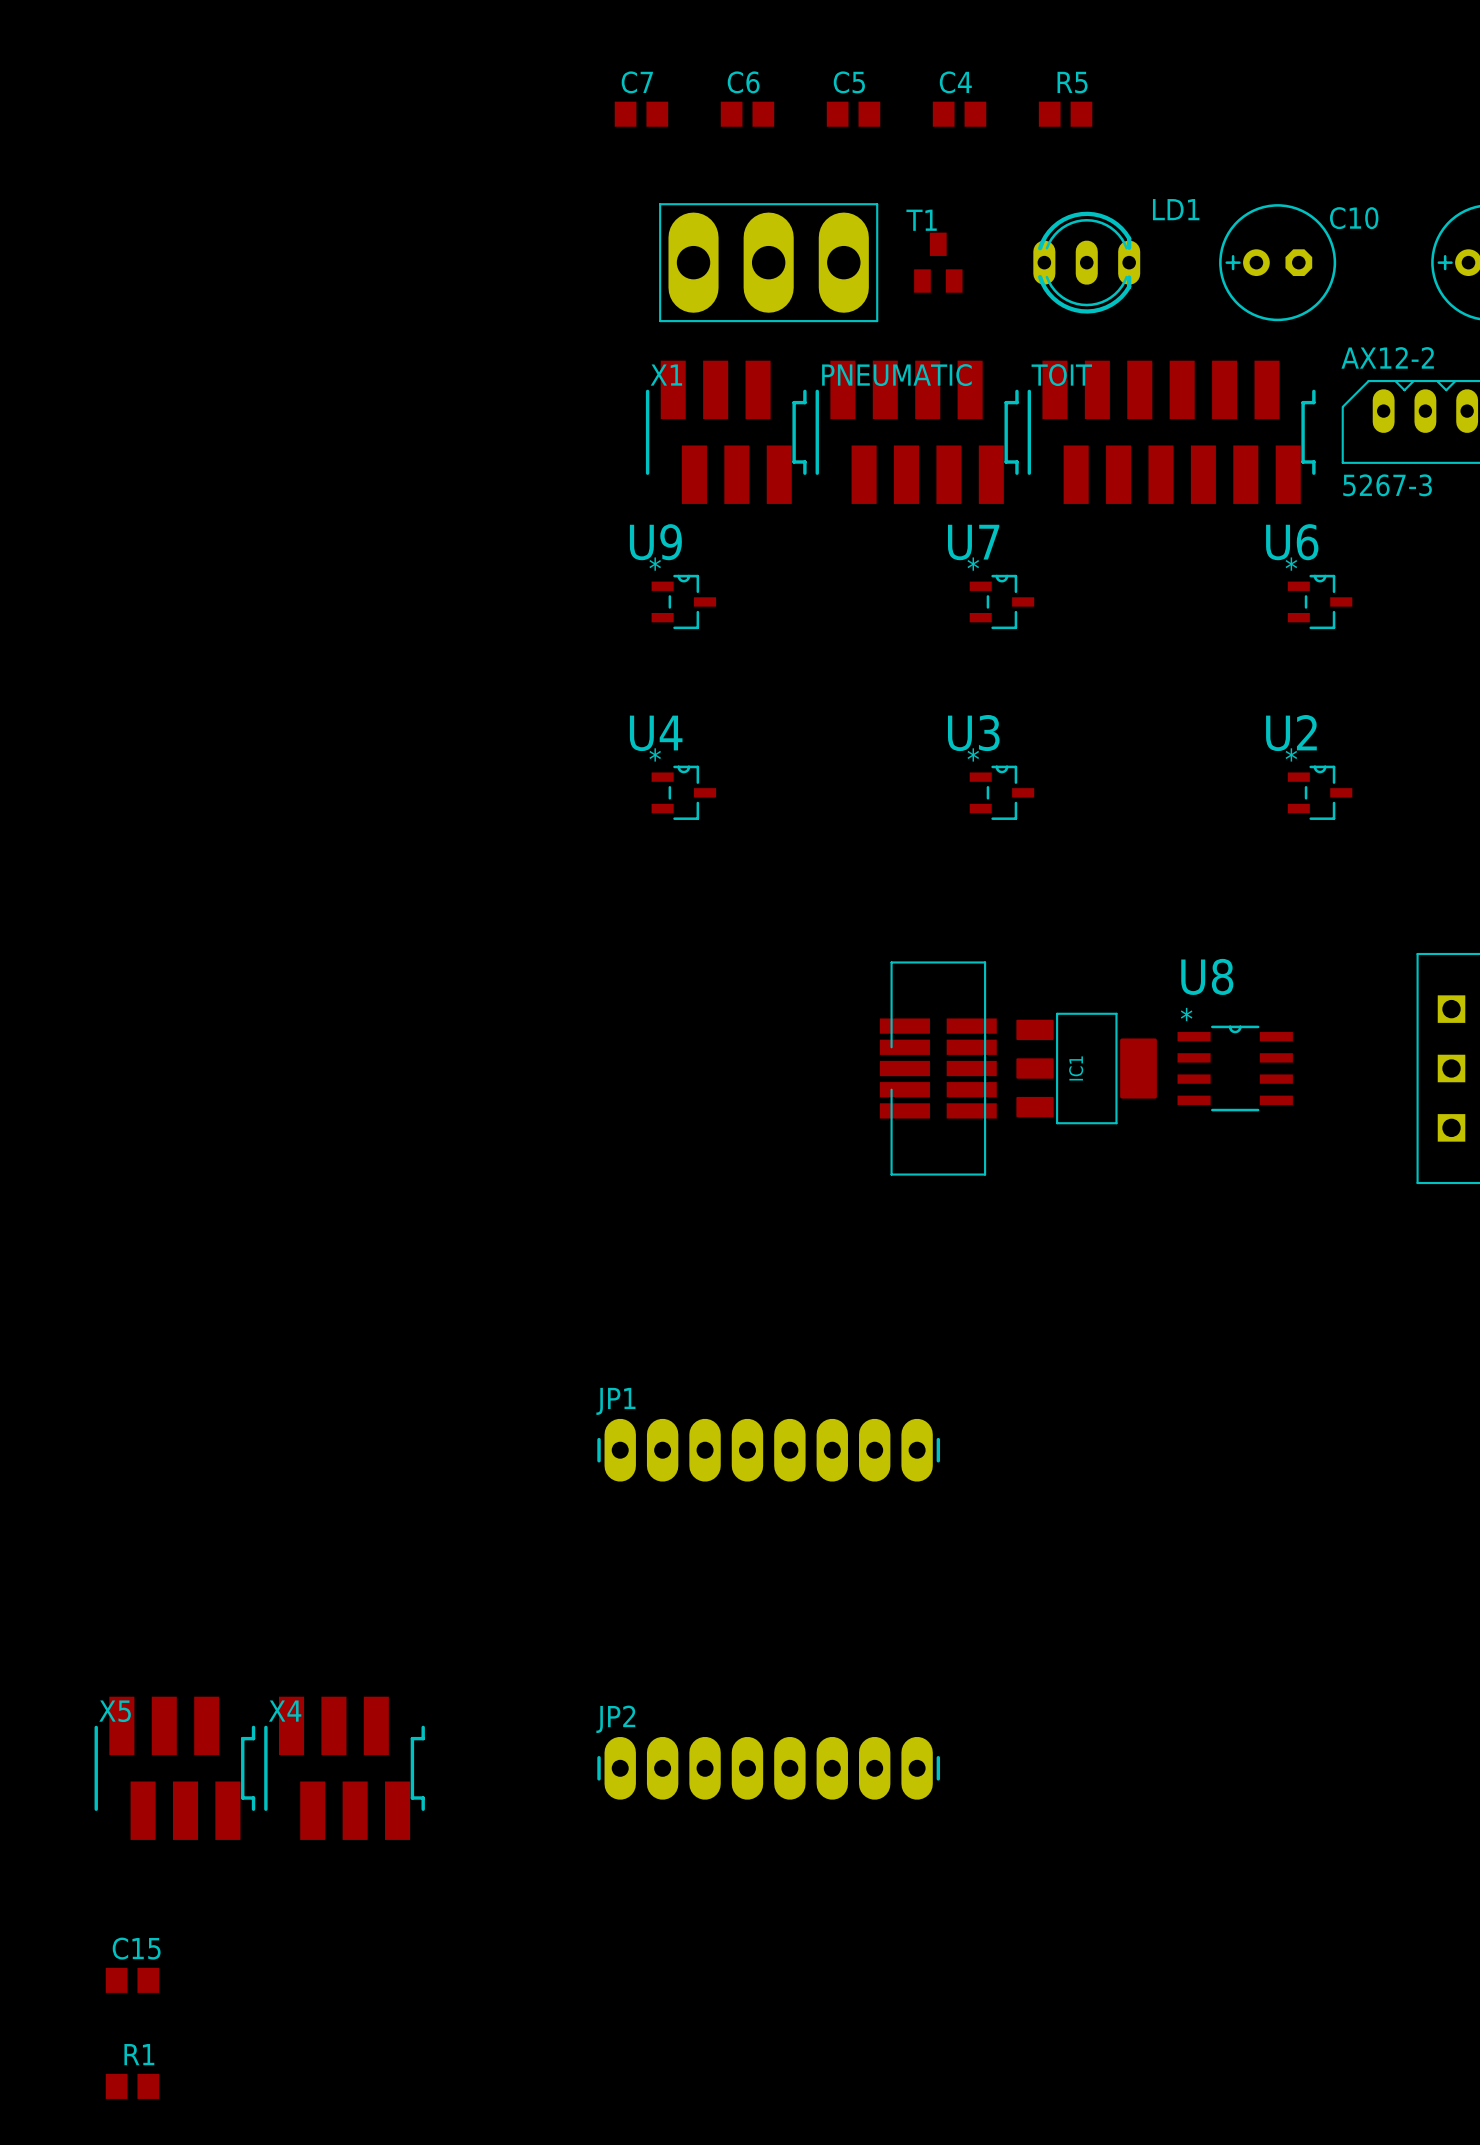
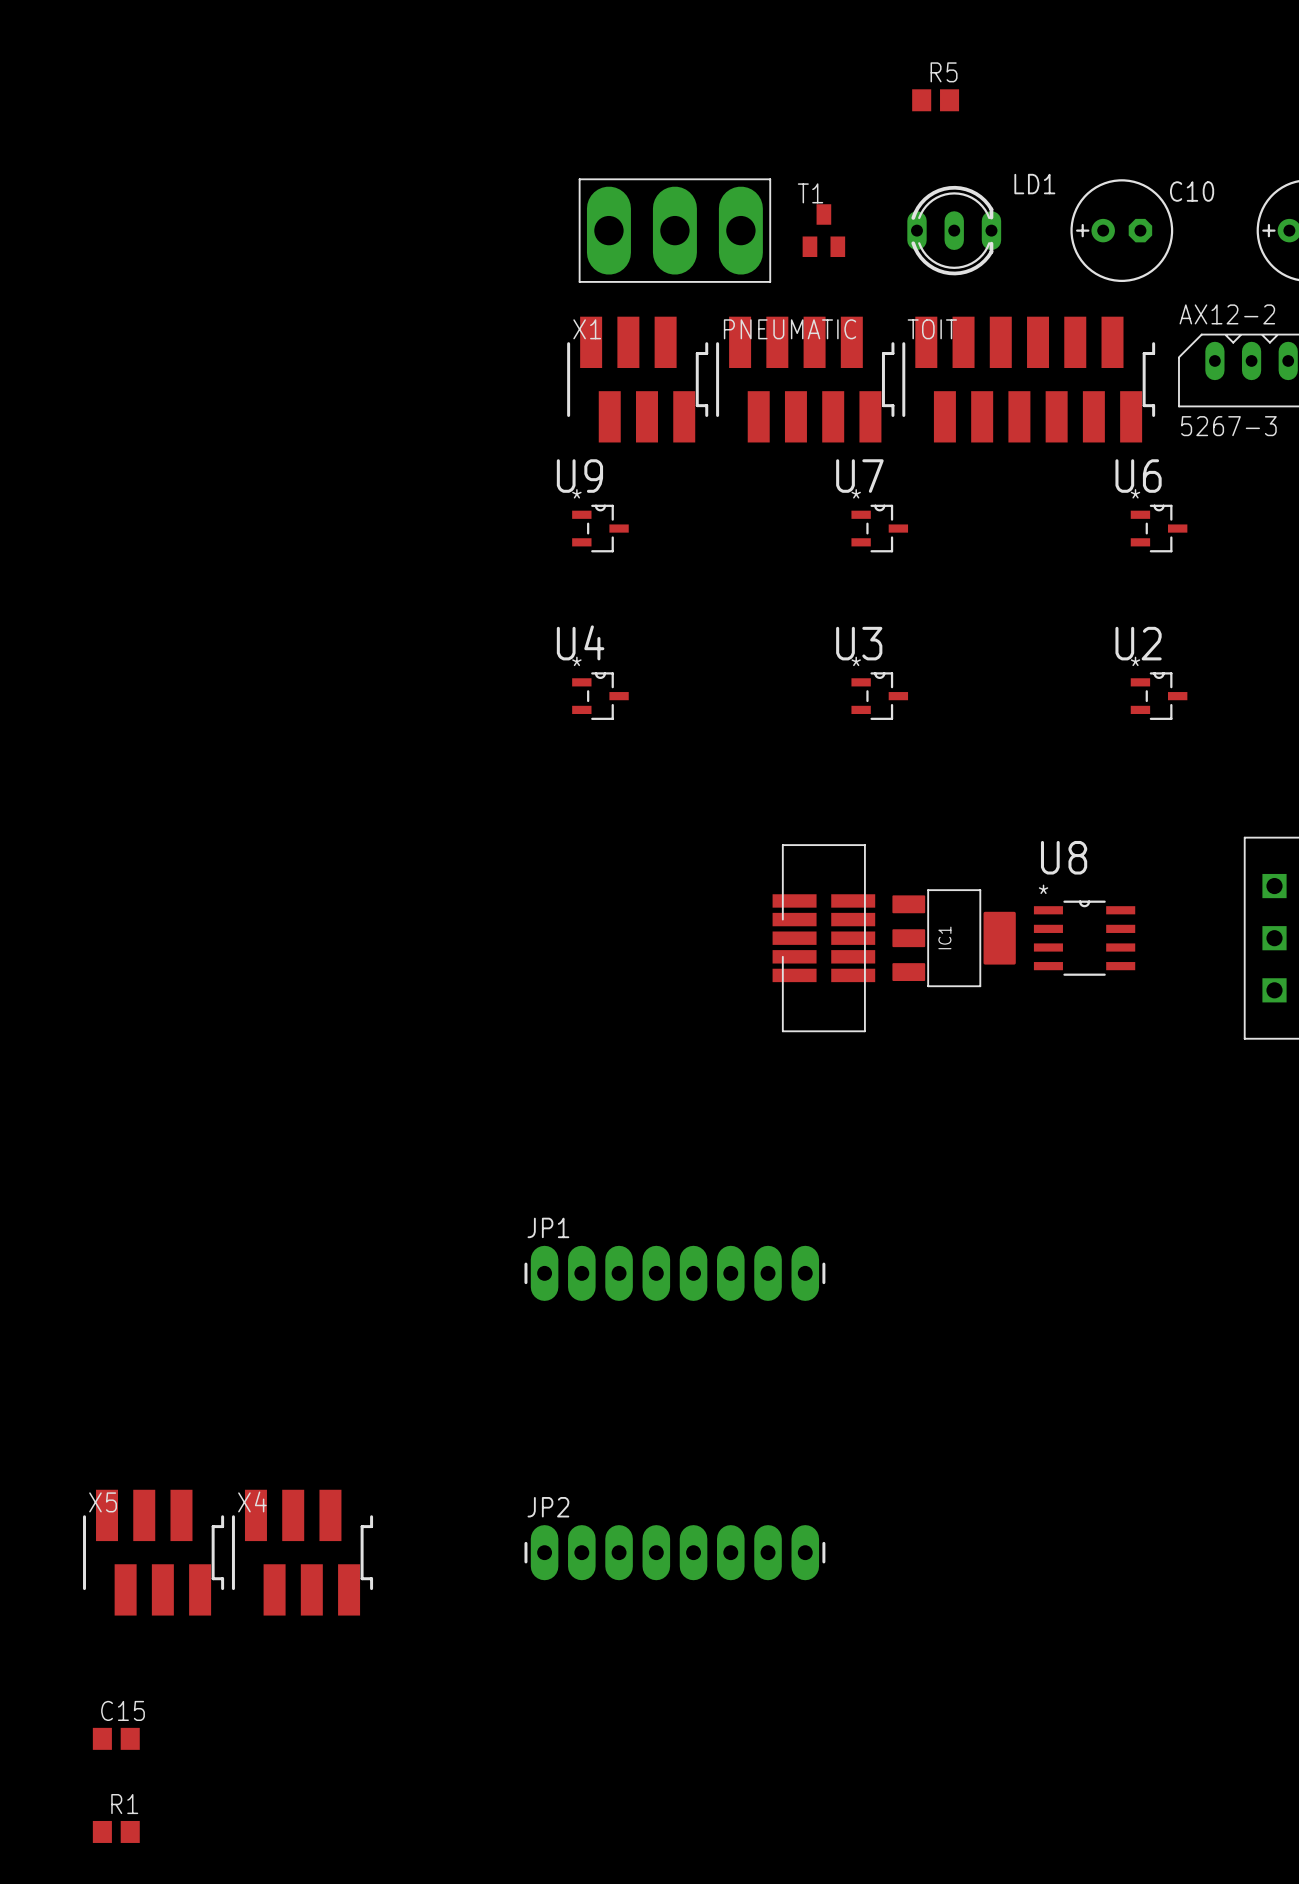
C7: (641, 114) -> none
C6: (747, 114) -> none
C5: (853, 114) -> none
C4: (959, 114) -> none

